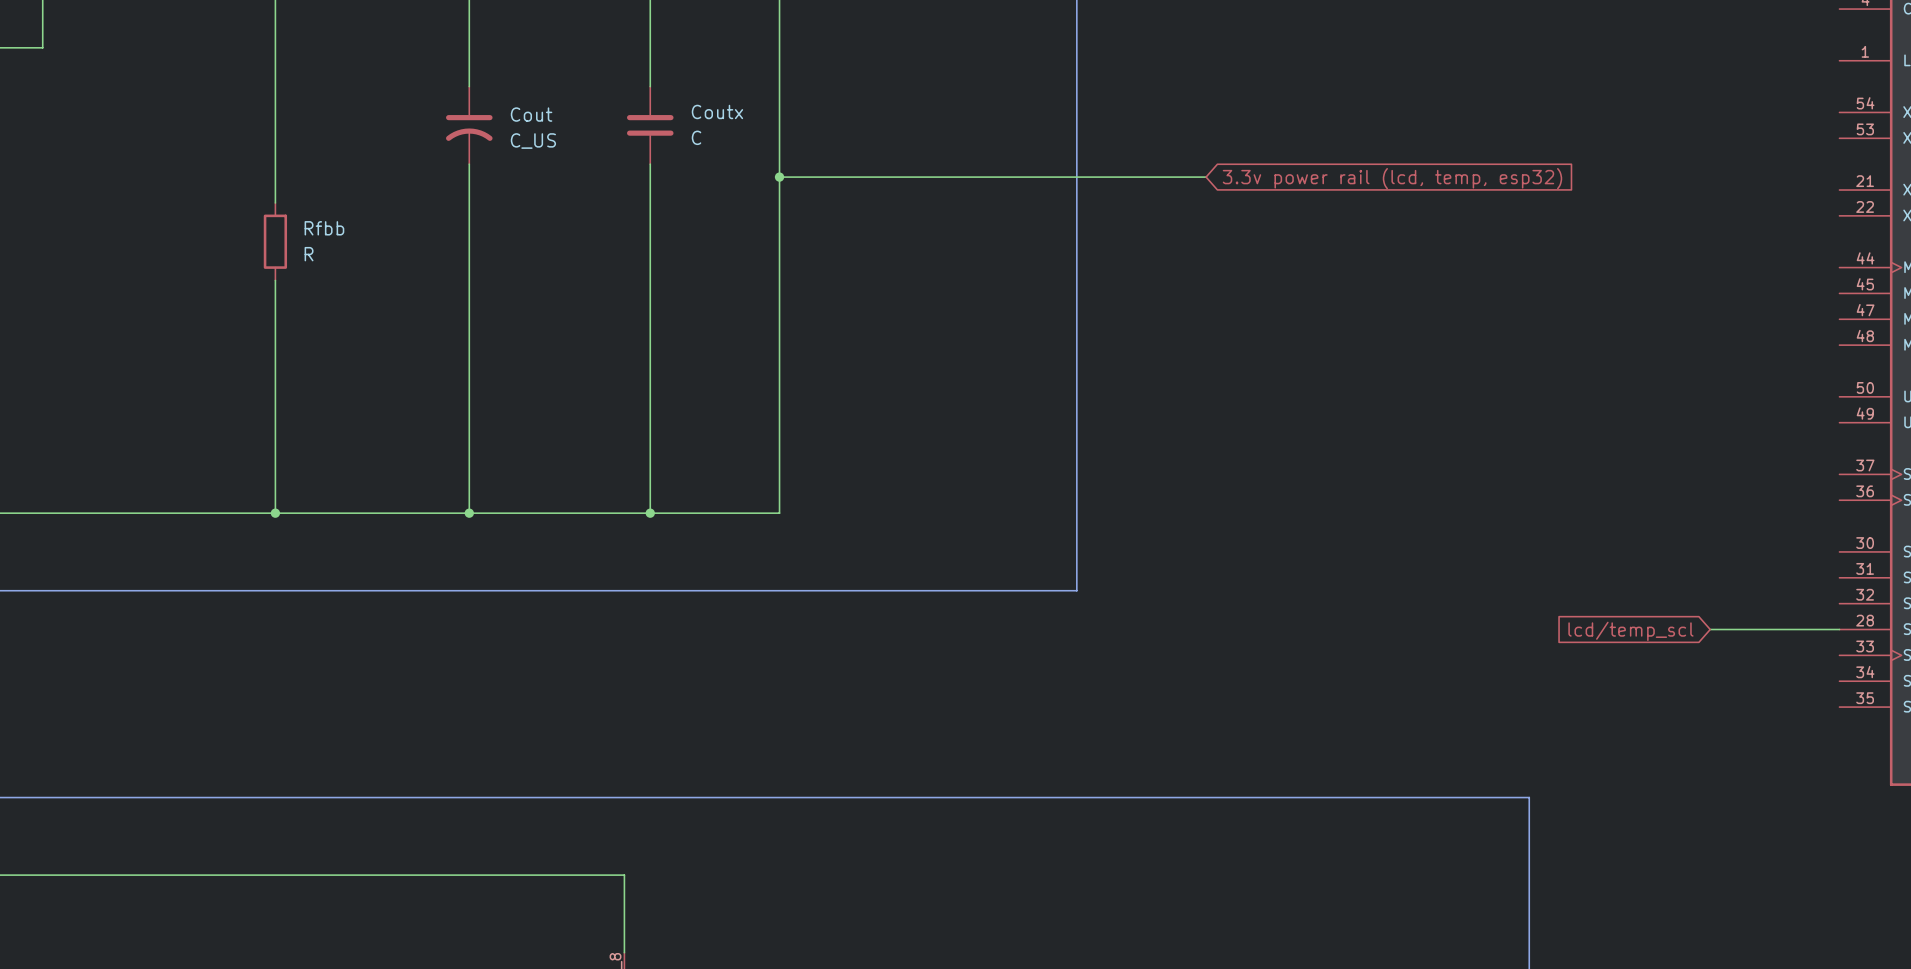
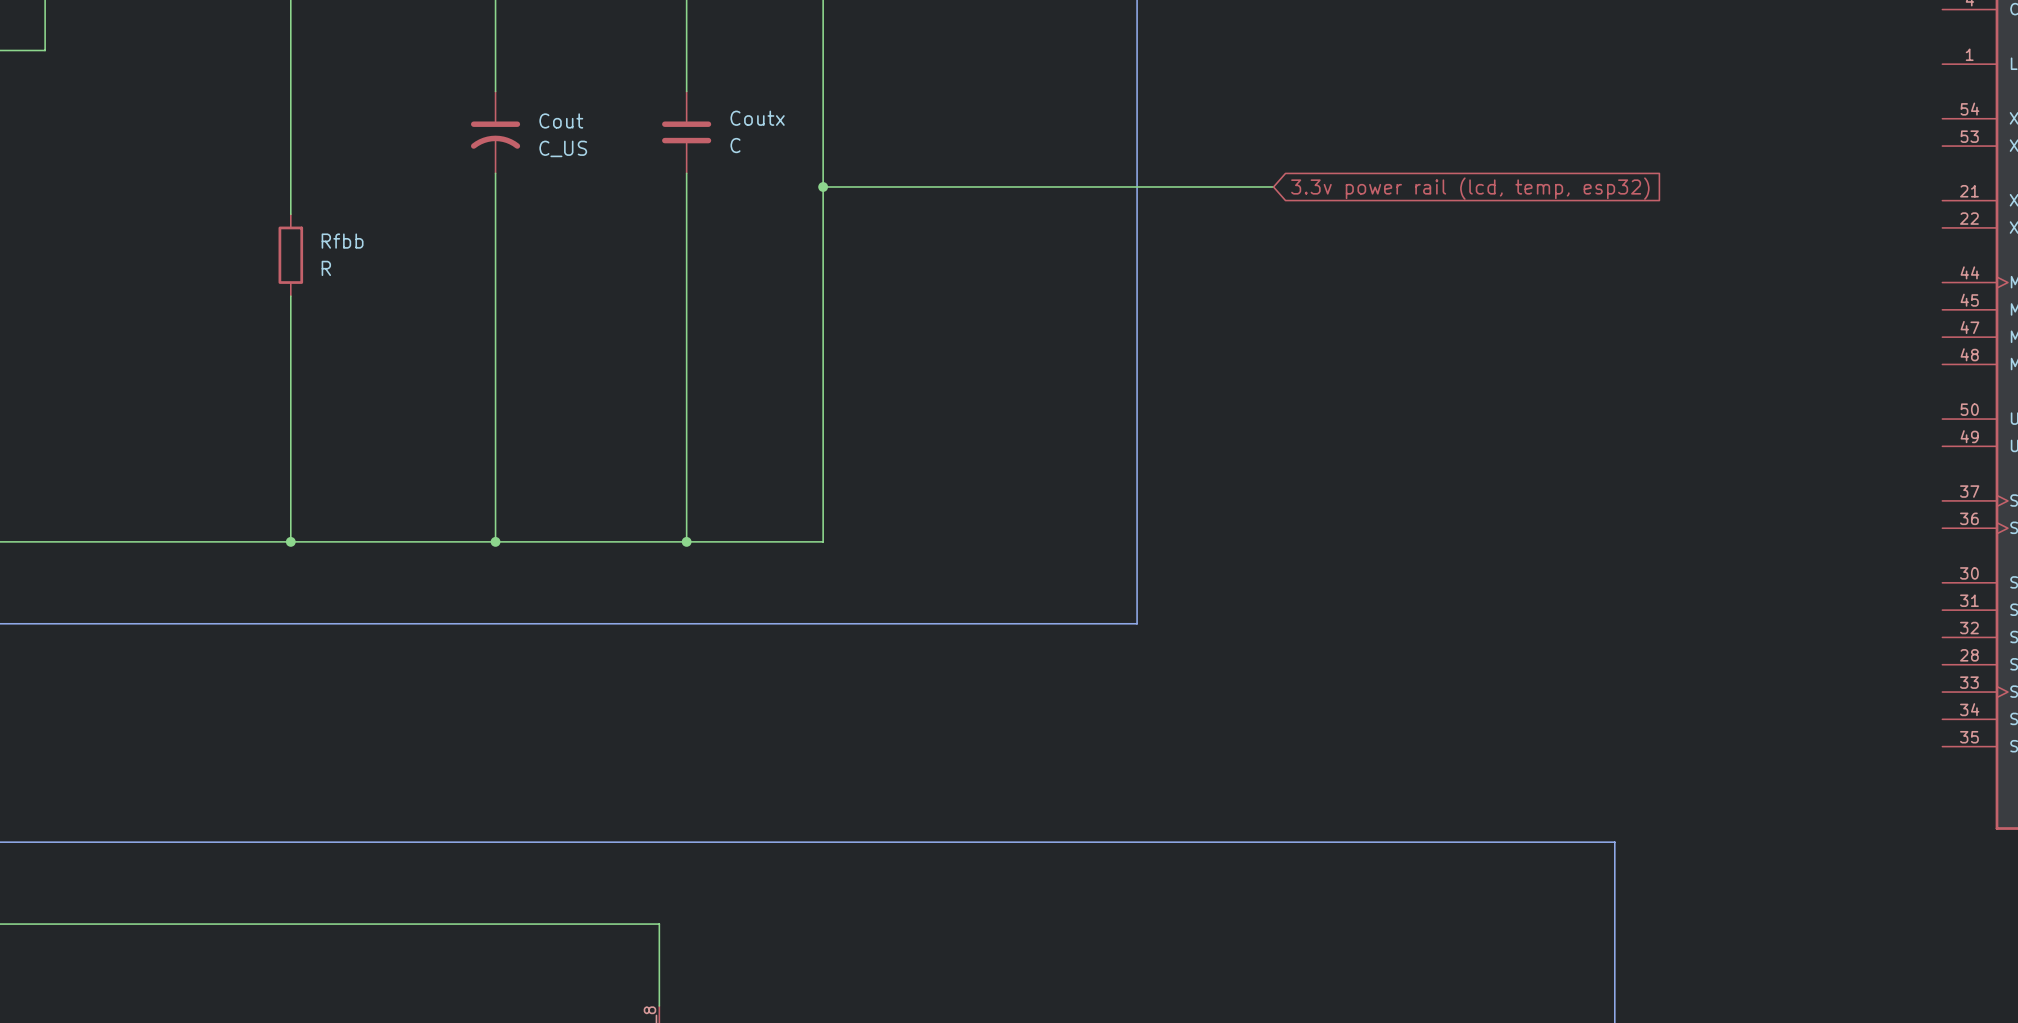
wire: (1710, 629) (1839, 629) -> none
global label: lcd/temp_scl (1630, 631) -> none

